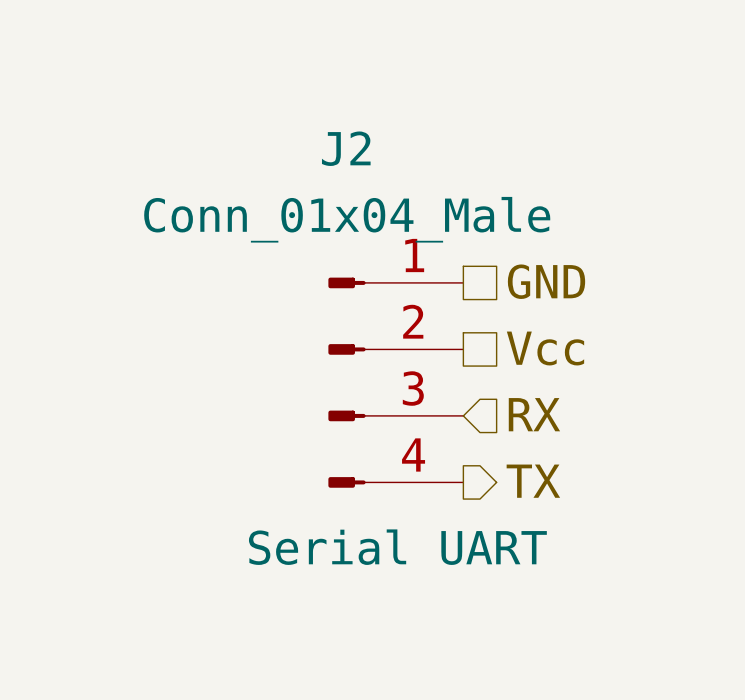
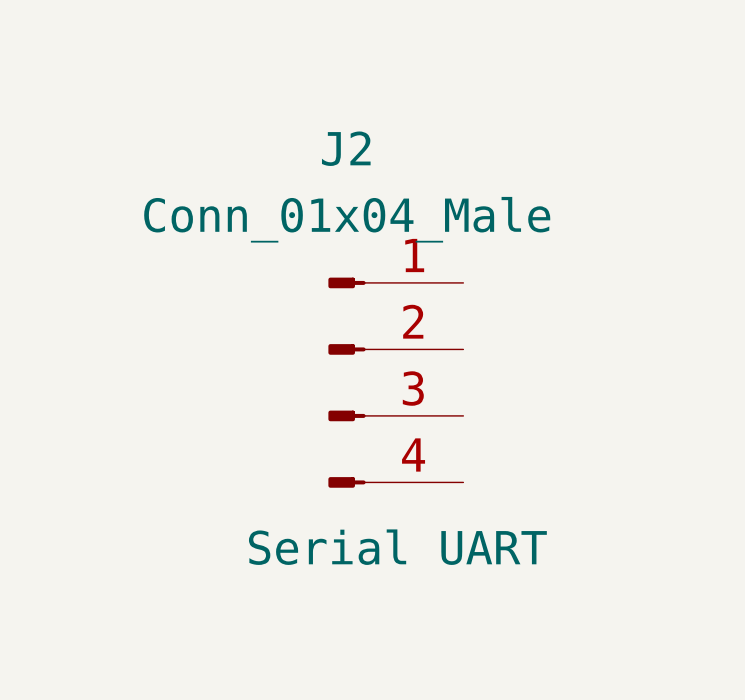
hierarchical label: GND (546, 281) -> none
hierarchical label: Vcc (545, 348) -> none
hierarchical label: RX (534, 414) -> none
hierarchical label: TX (533, 481) -> none

